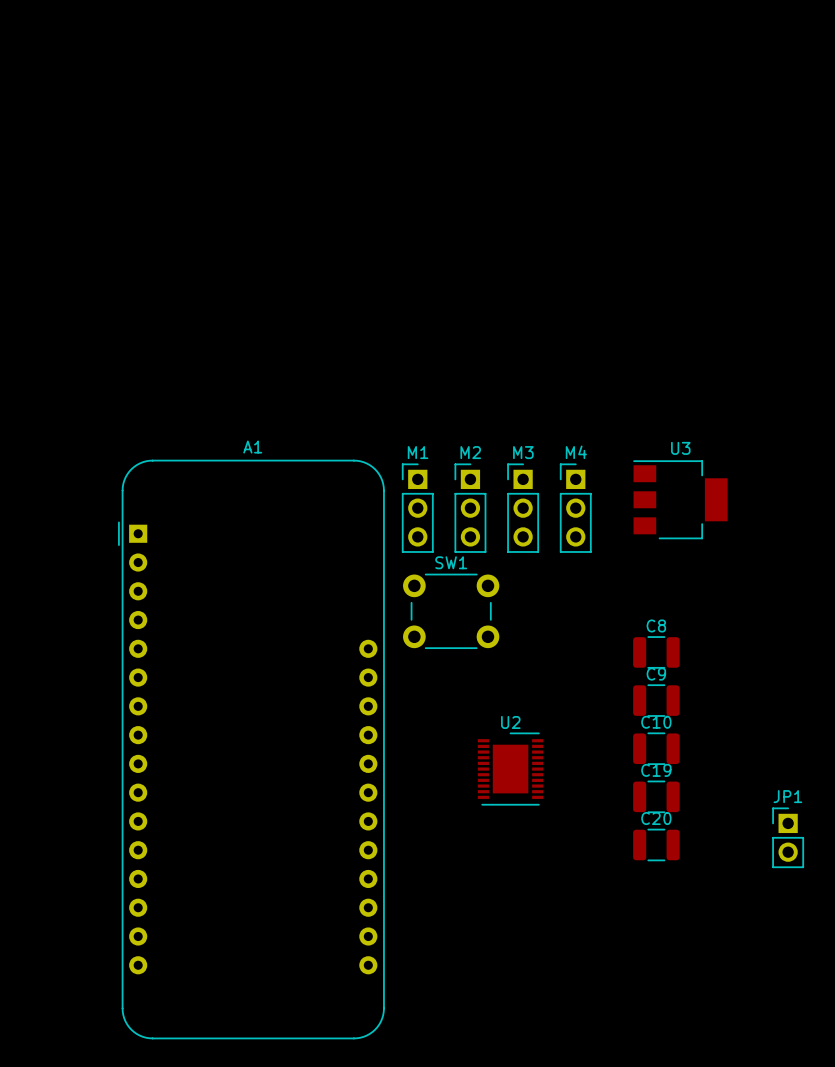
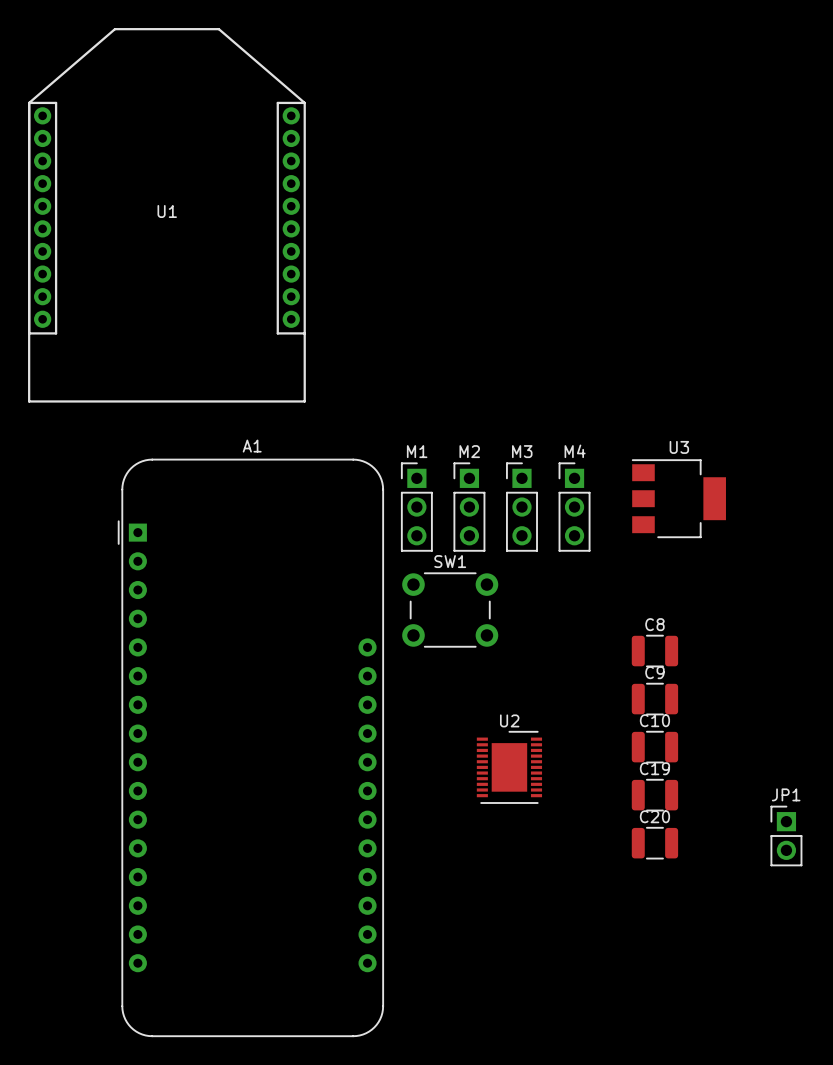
U1: none -> (166, 215)

